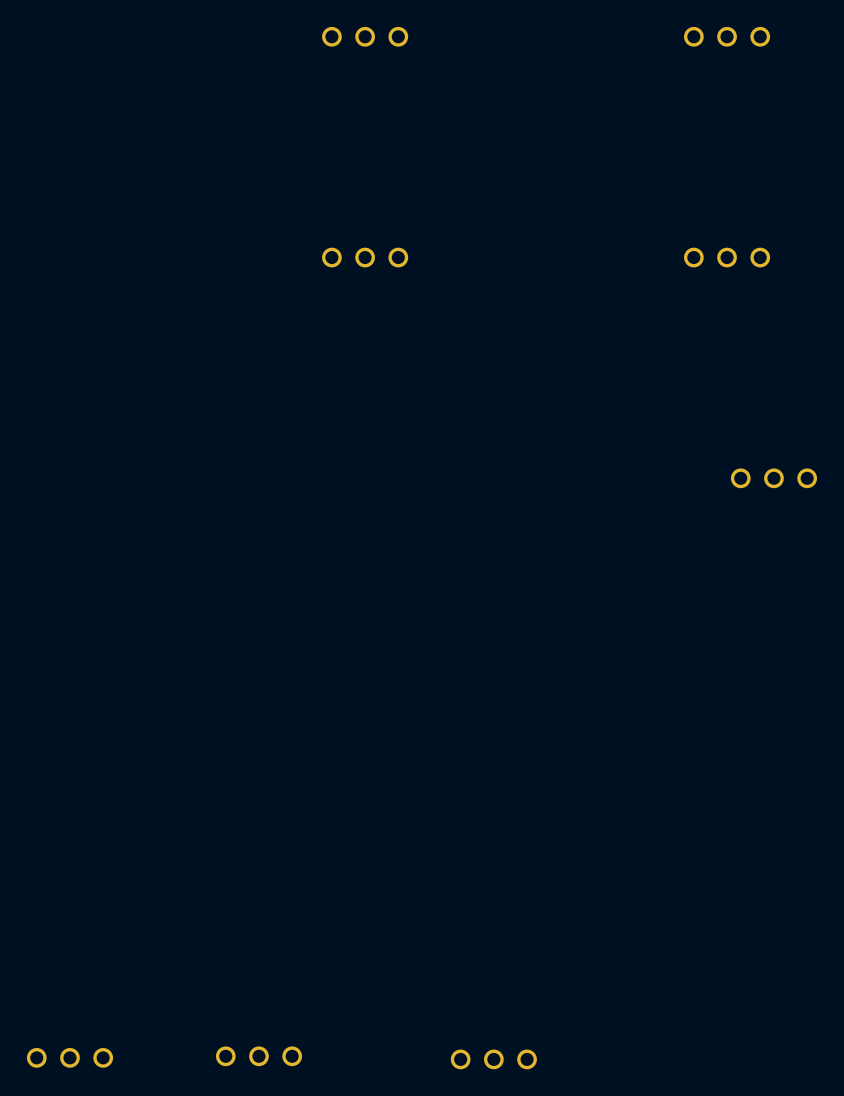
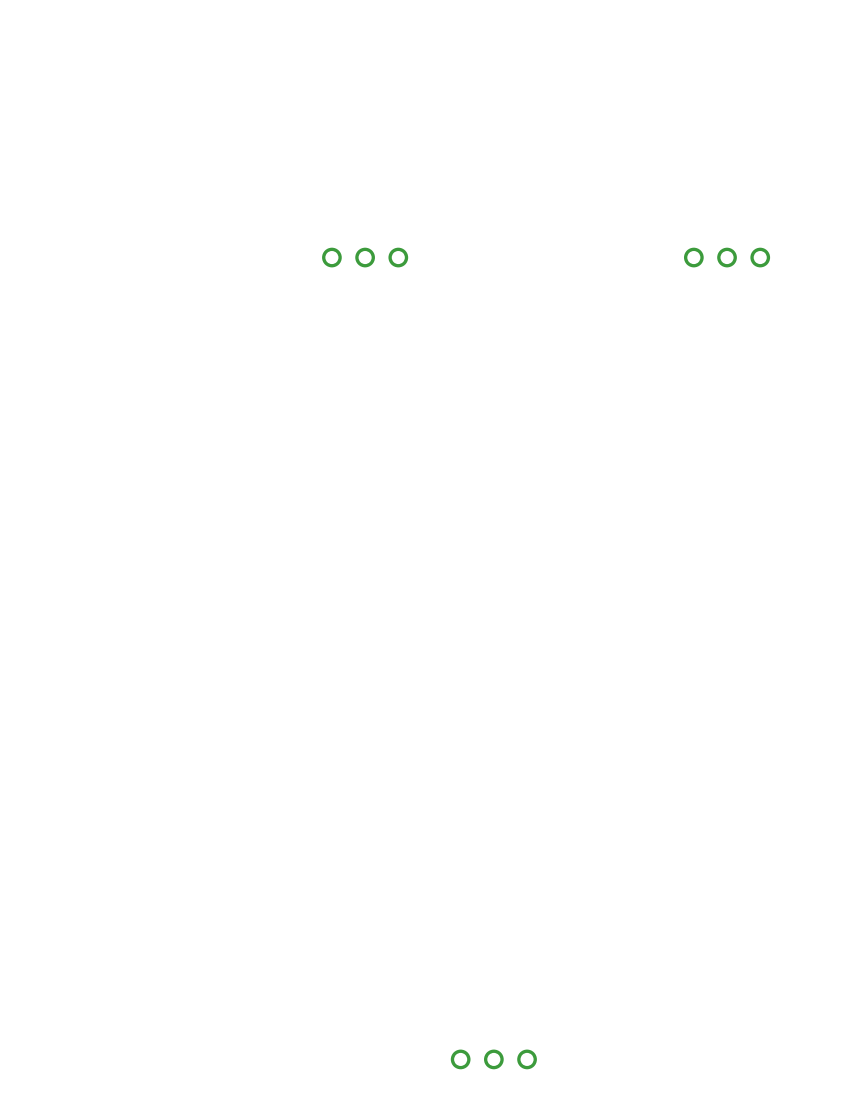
part: (365, 36) -> none
part: (727, 36) -> none
part: (773, 478) -> none
part: (258, 1056) -> none
part: (69, 1057) -> none

